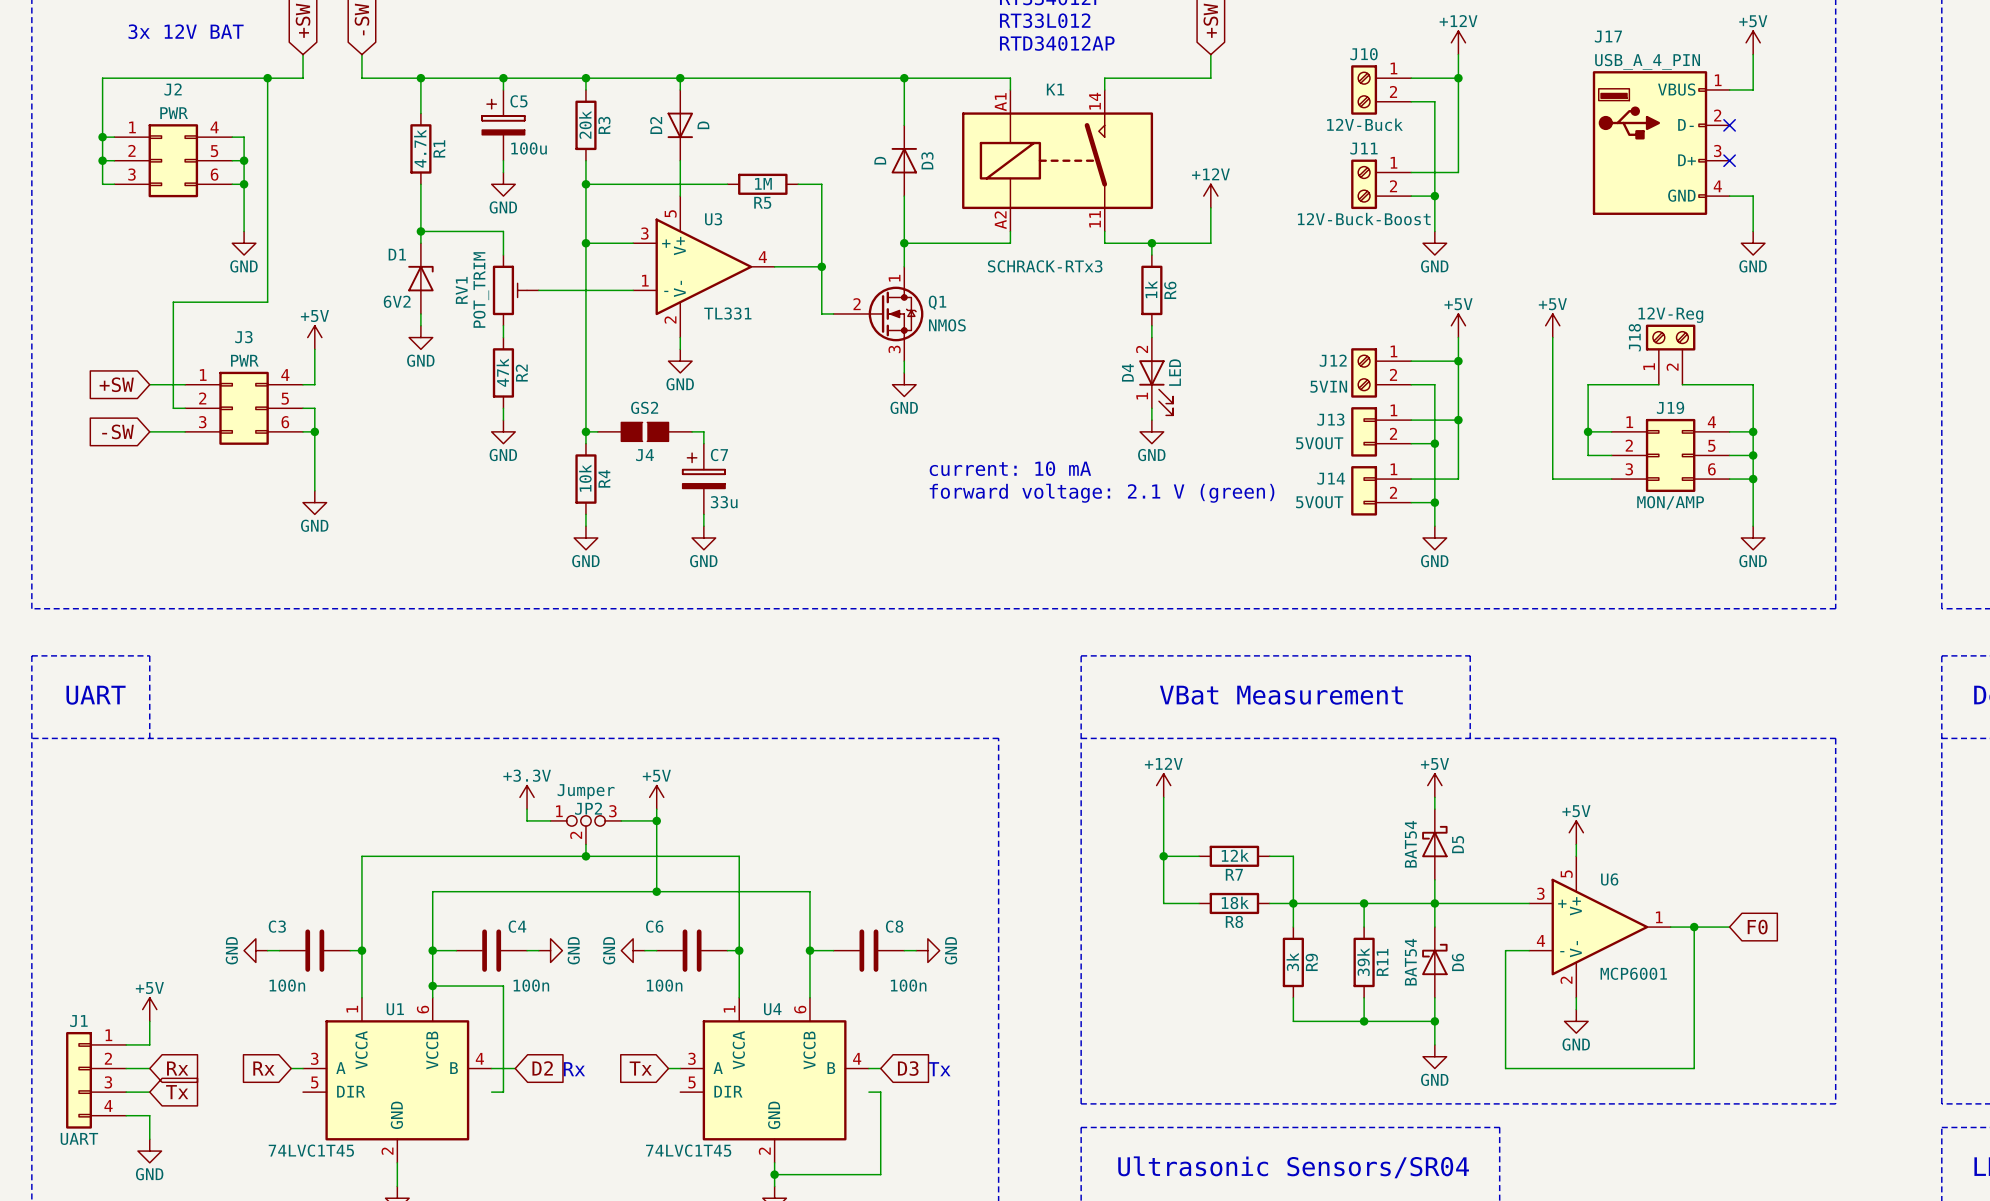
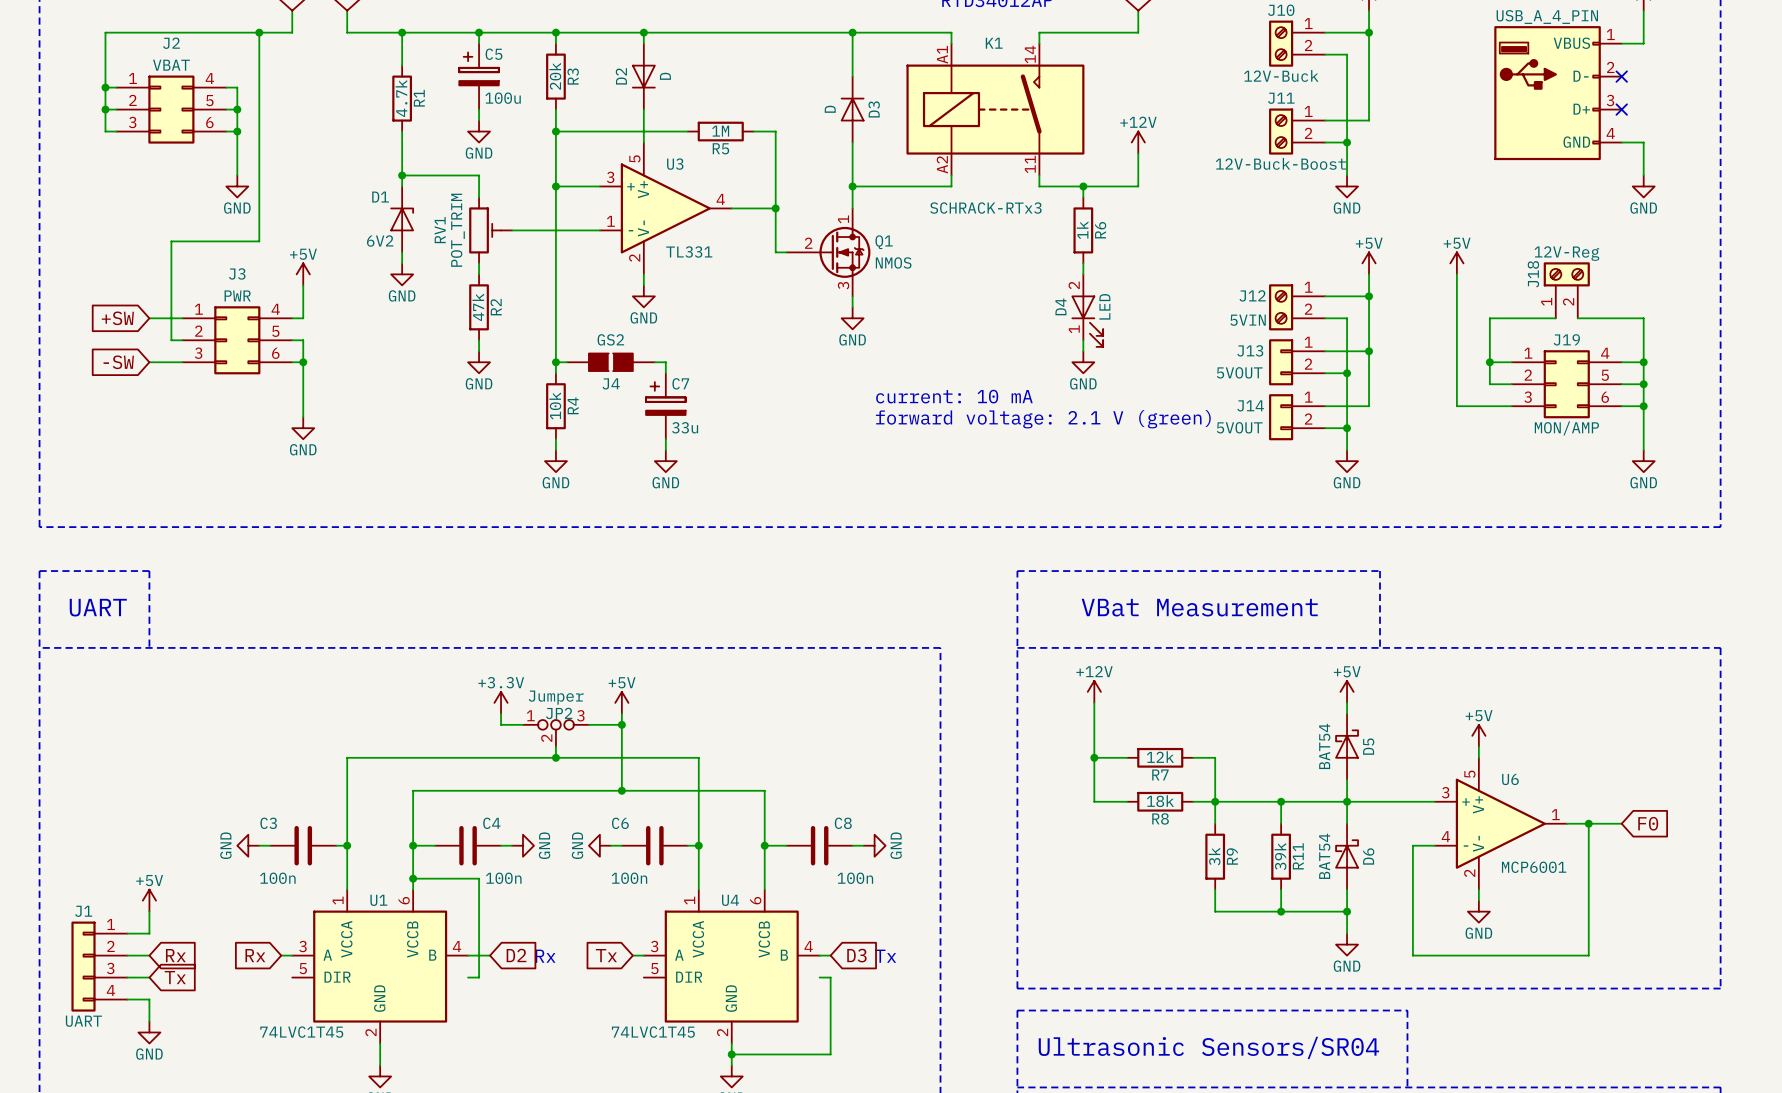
J2 value: PWR (174, 113) -> VBAT (171, 65)

